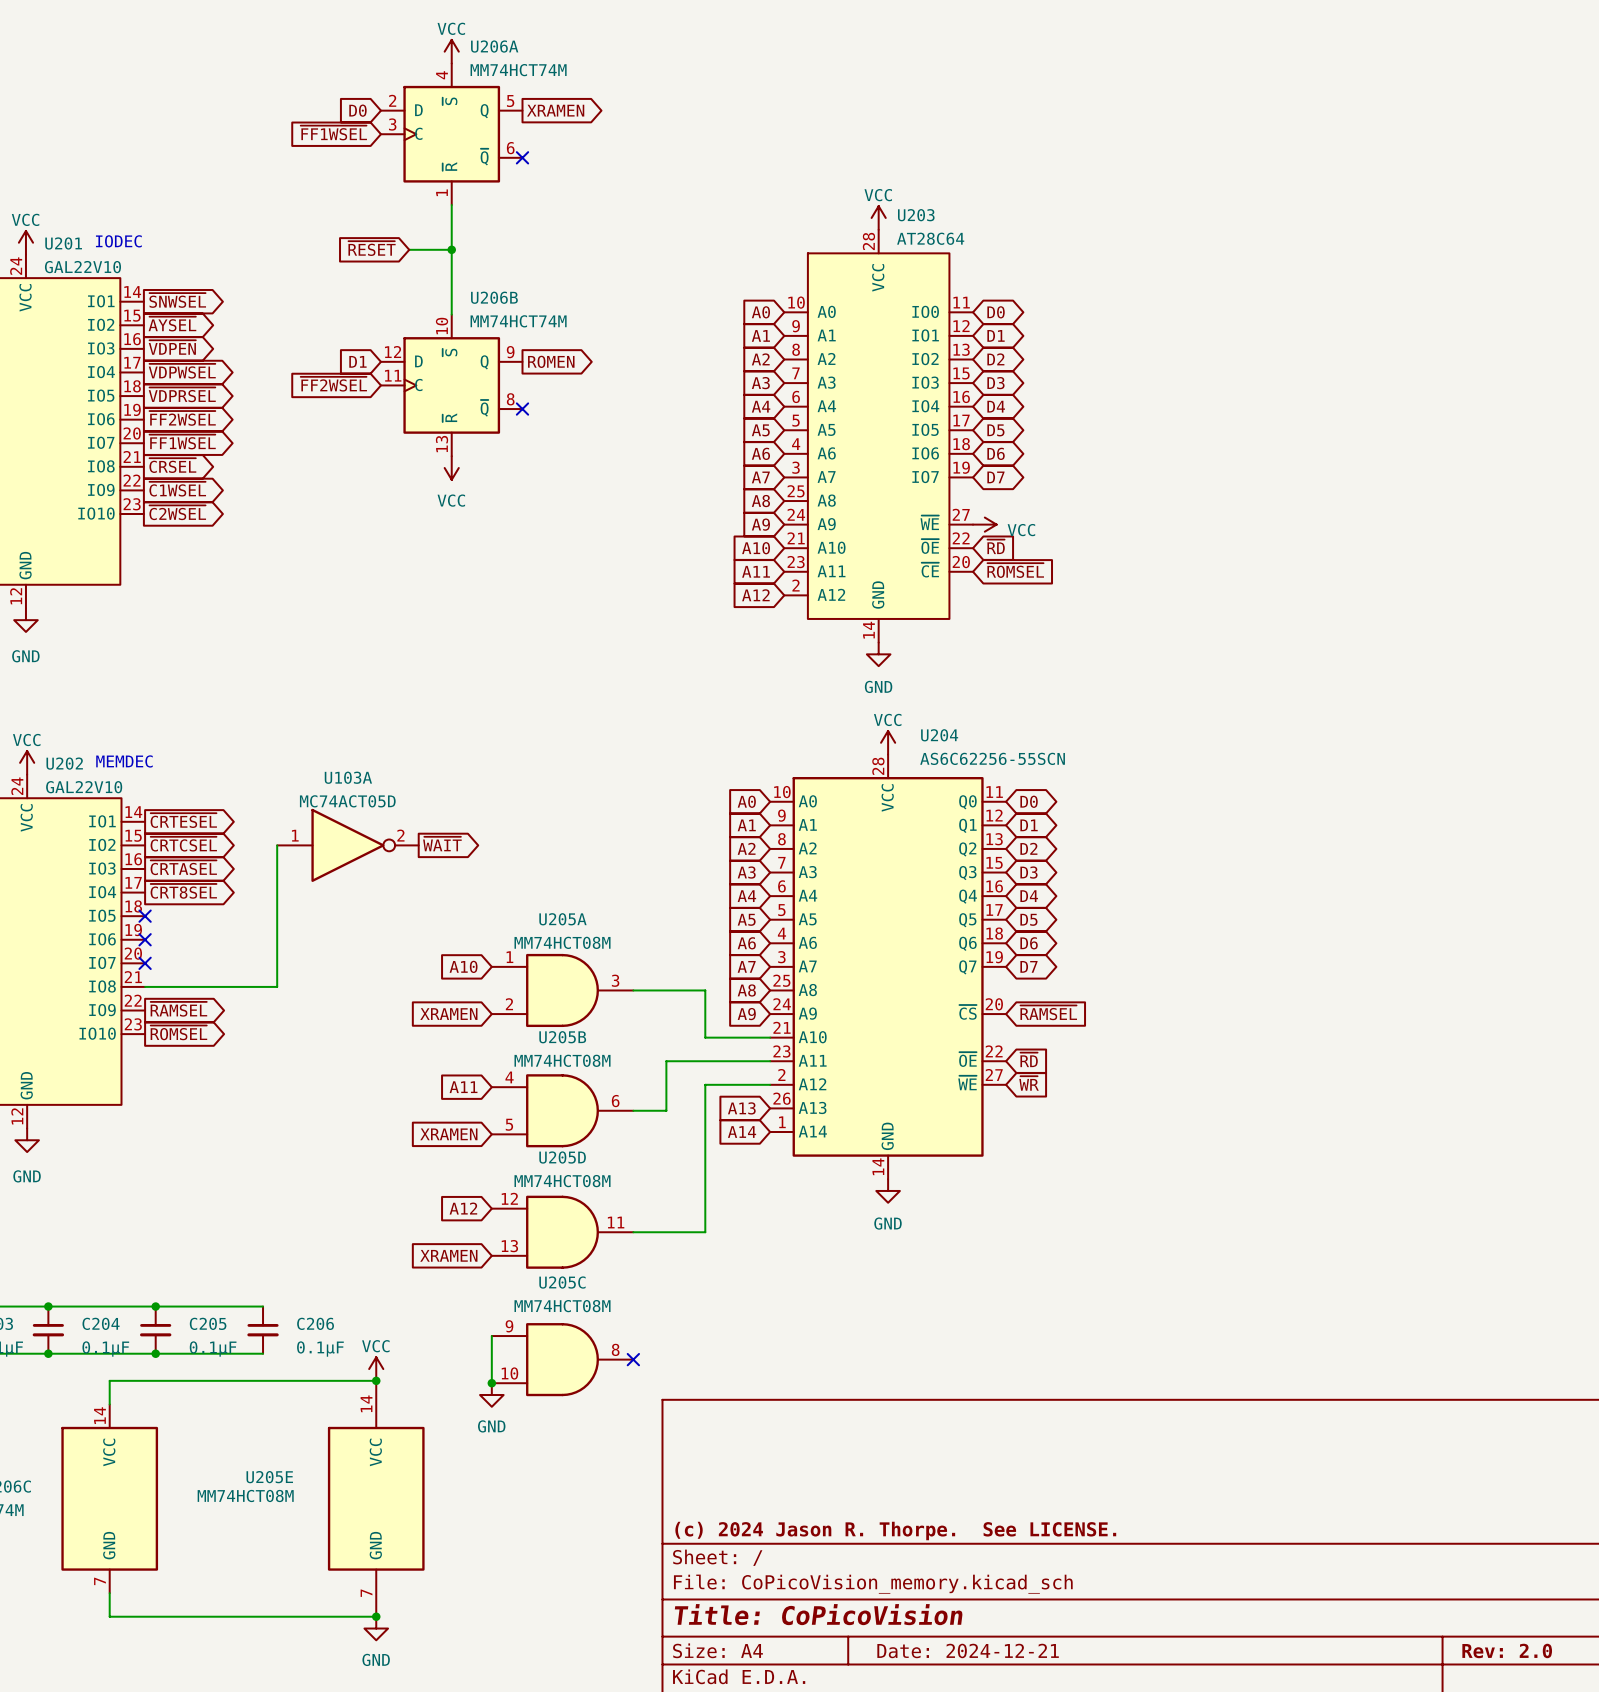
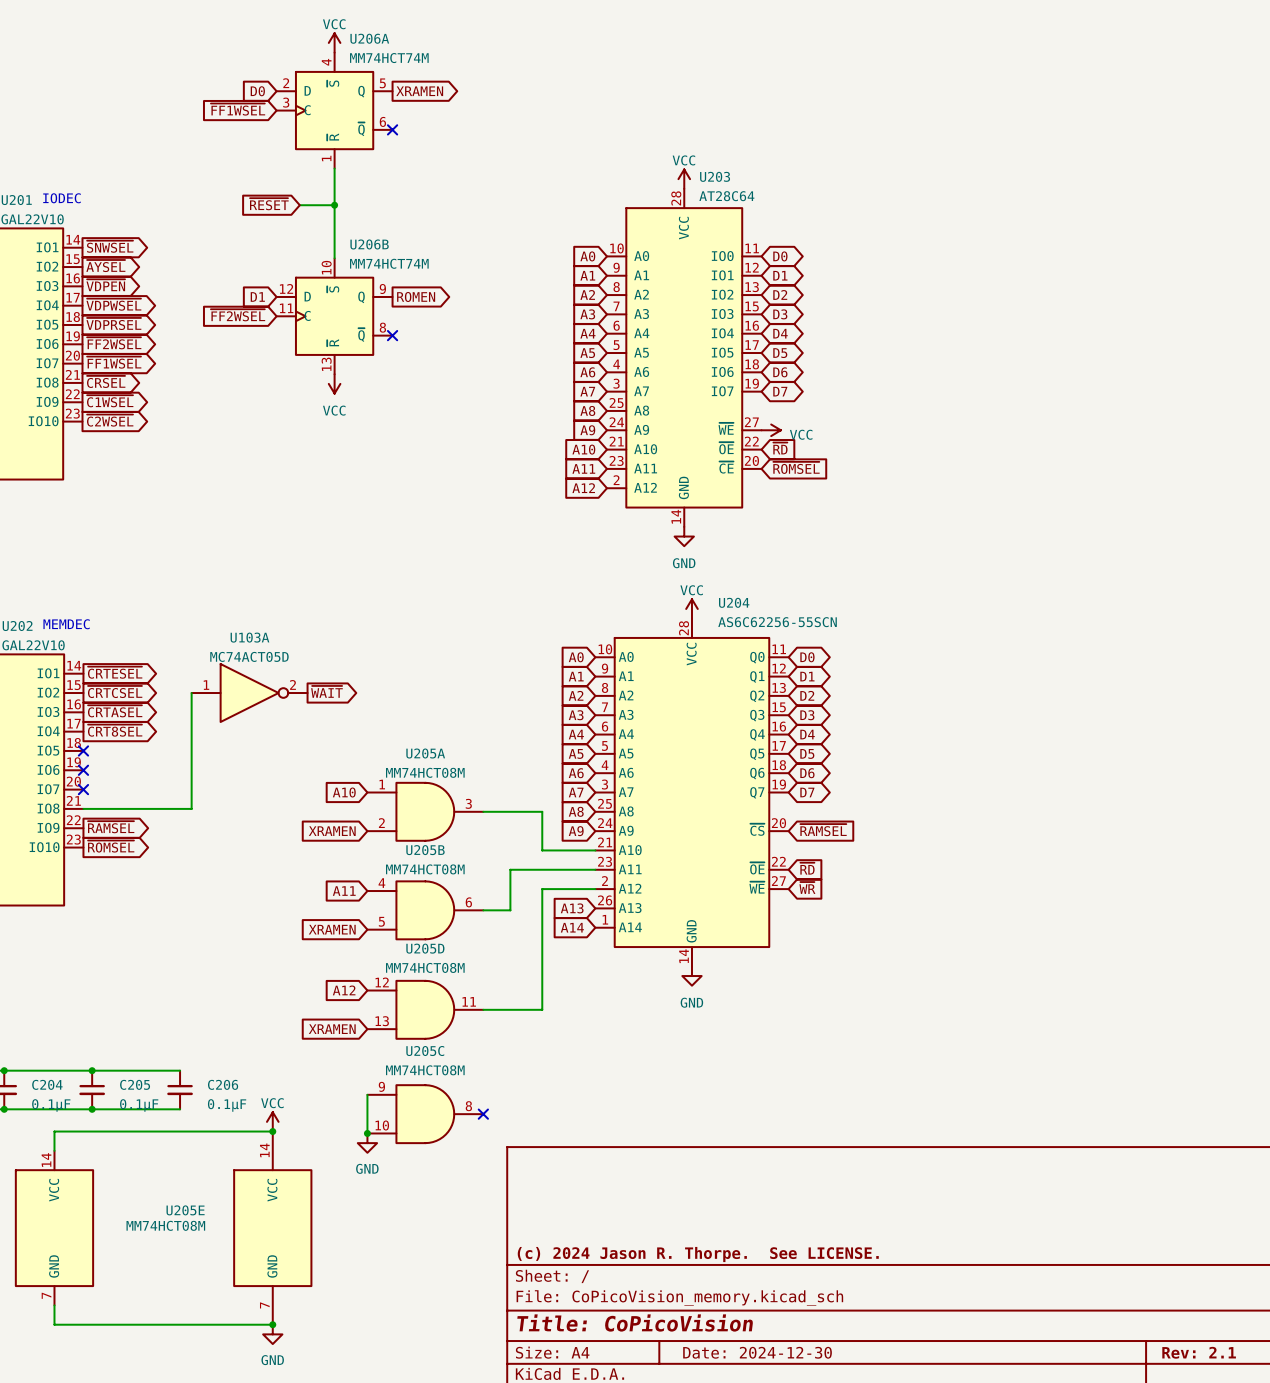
title block: Date: 2024-12-21 (968, 1650) -> Date: 2024-12-30 (757, 1352)
title block: Rev: 2.0 (1507, 1650) -> Rev: 2.1 (1199, 1352)

